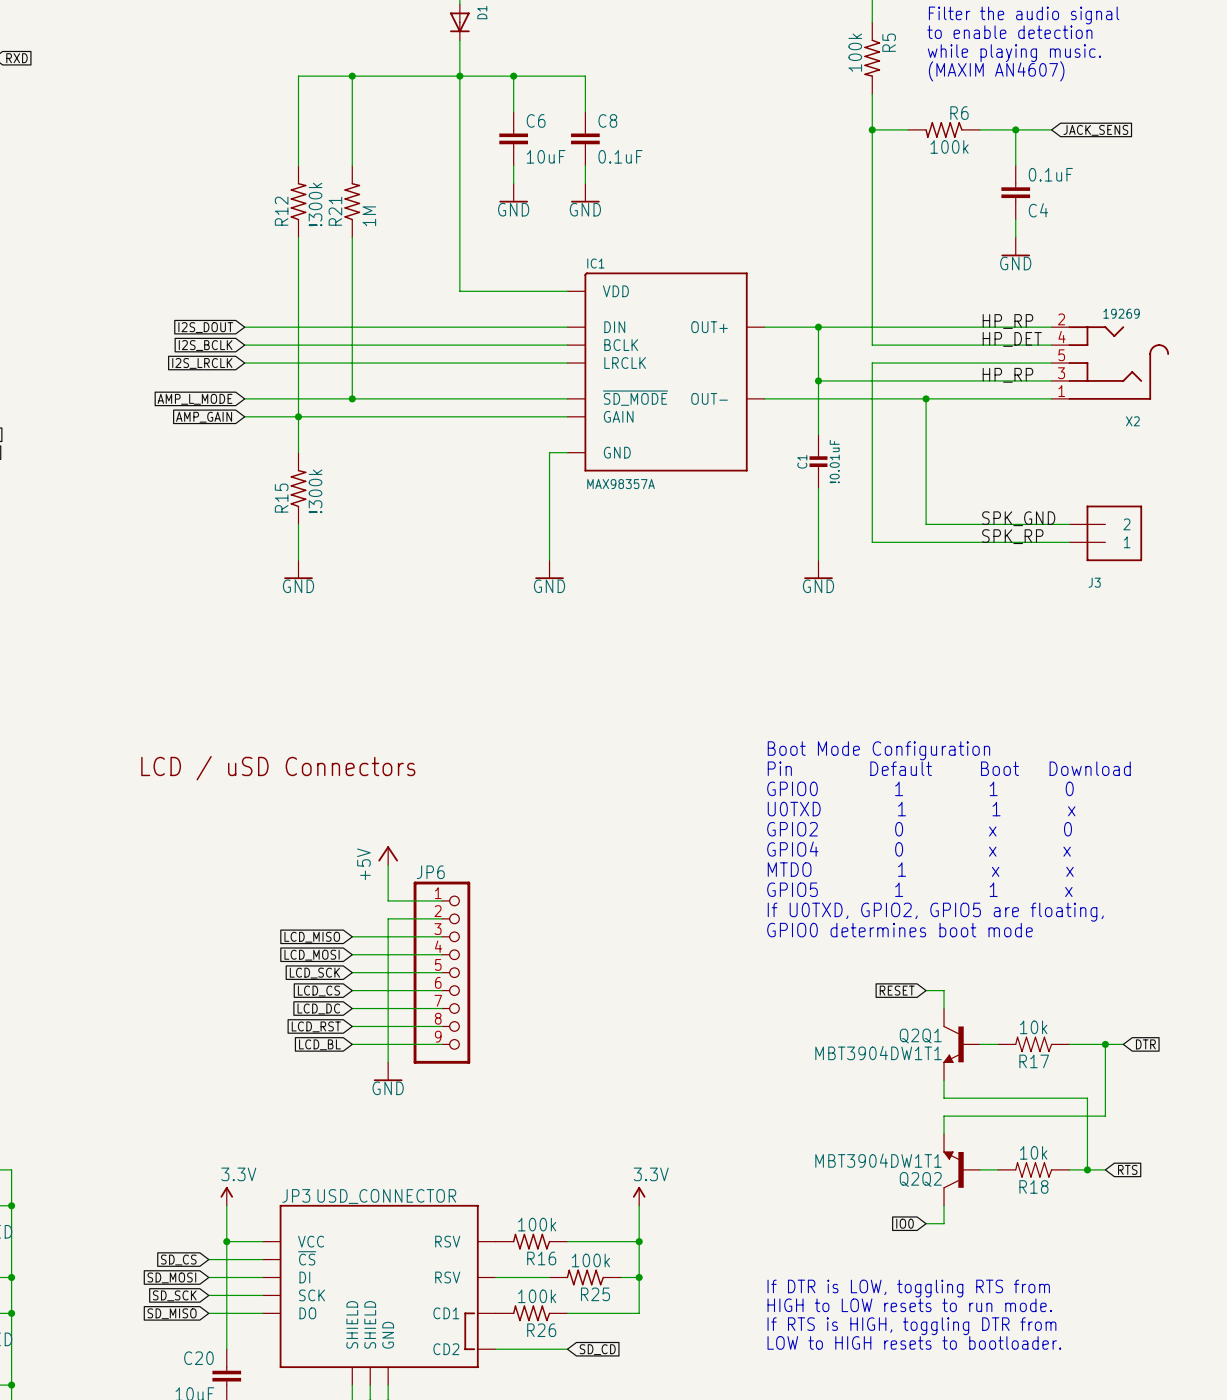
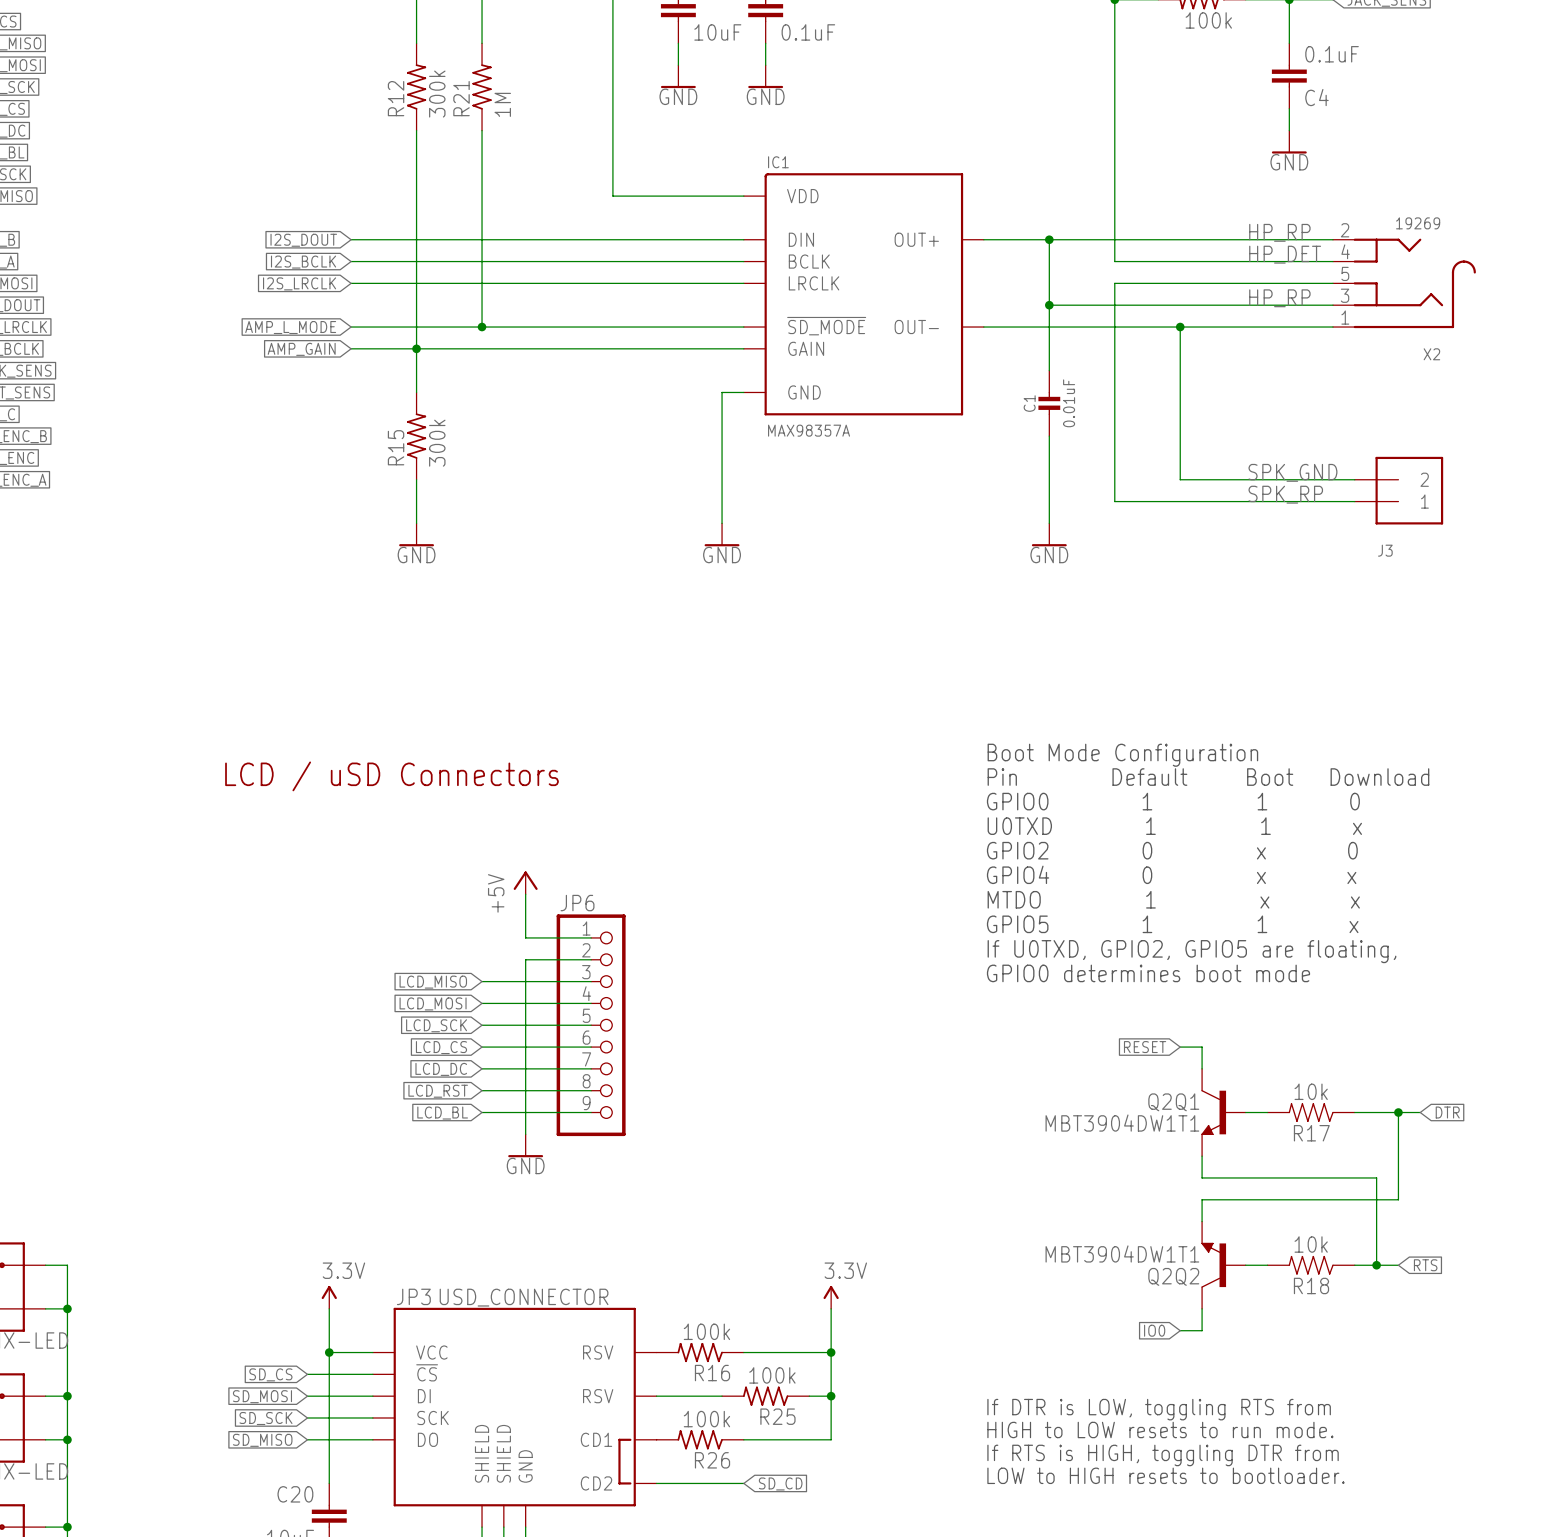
R12 value: !300k (315, 204) -> 300k (437, 94)
C1 value: !0.01uF (834, 461) -> 0.01uF (1069, 403)
R15 value: !300k (315, 491) -> 300k (437, 443)

